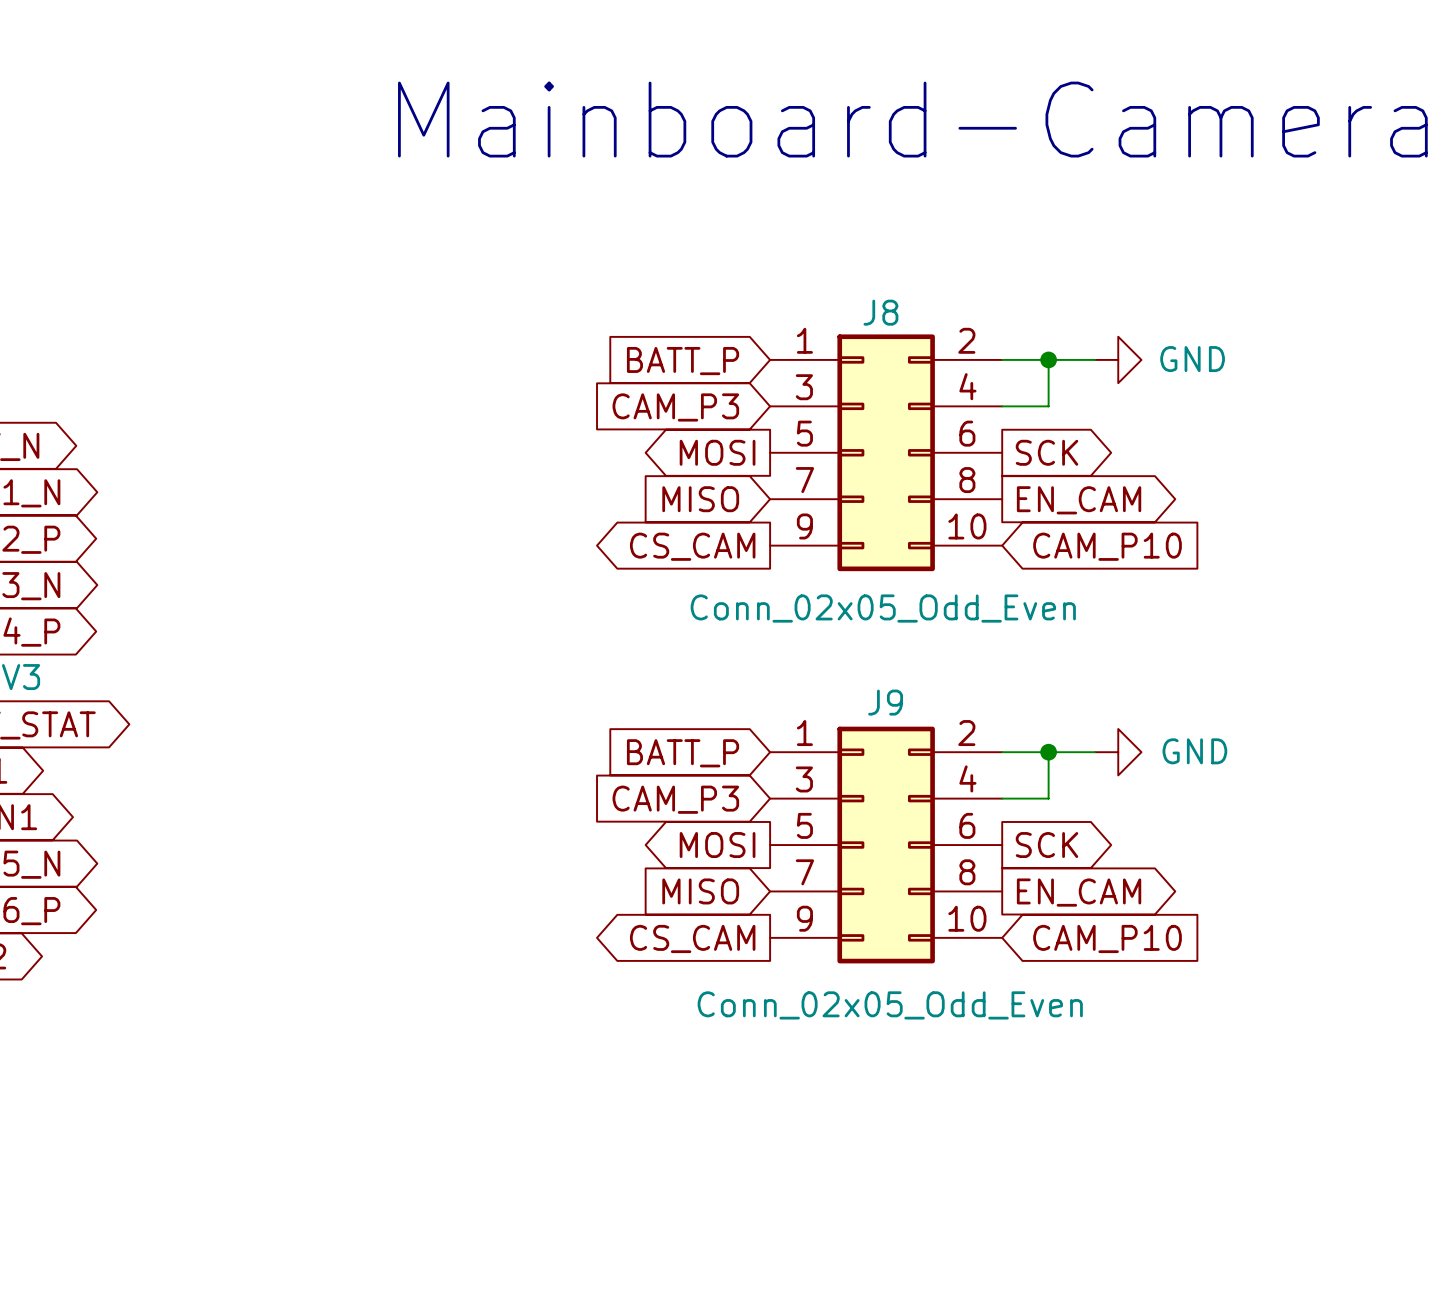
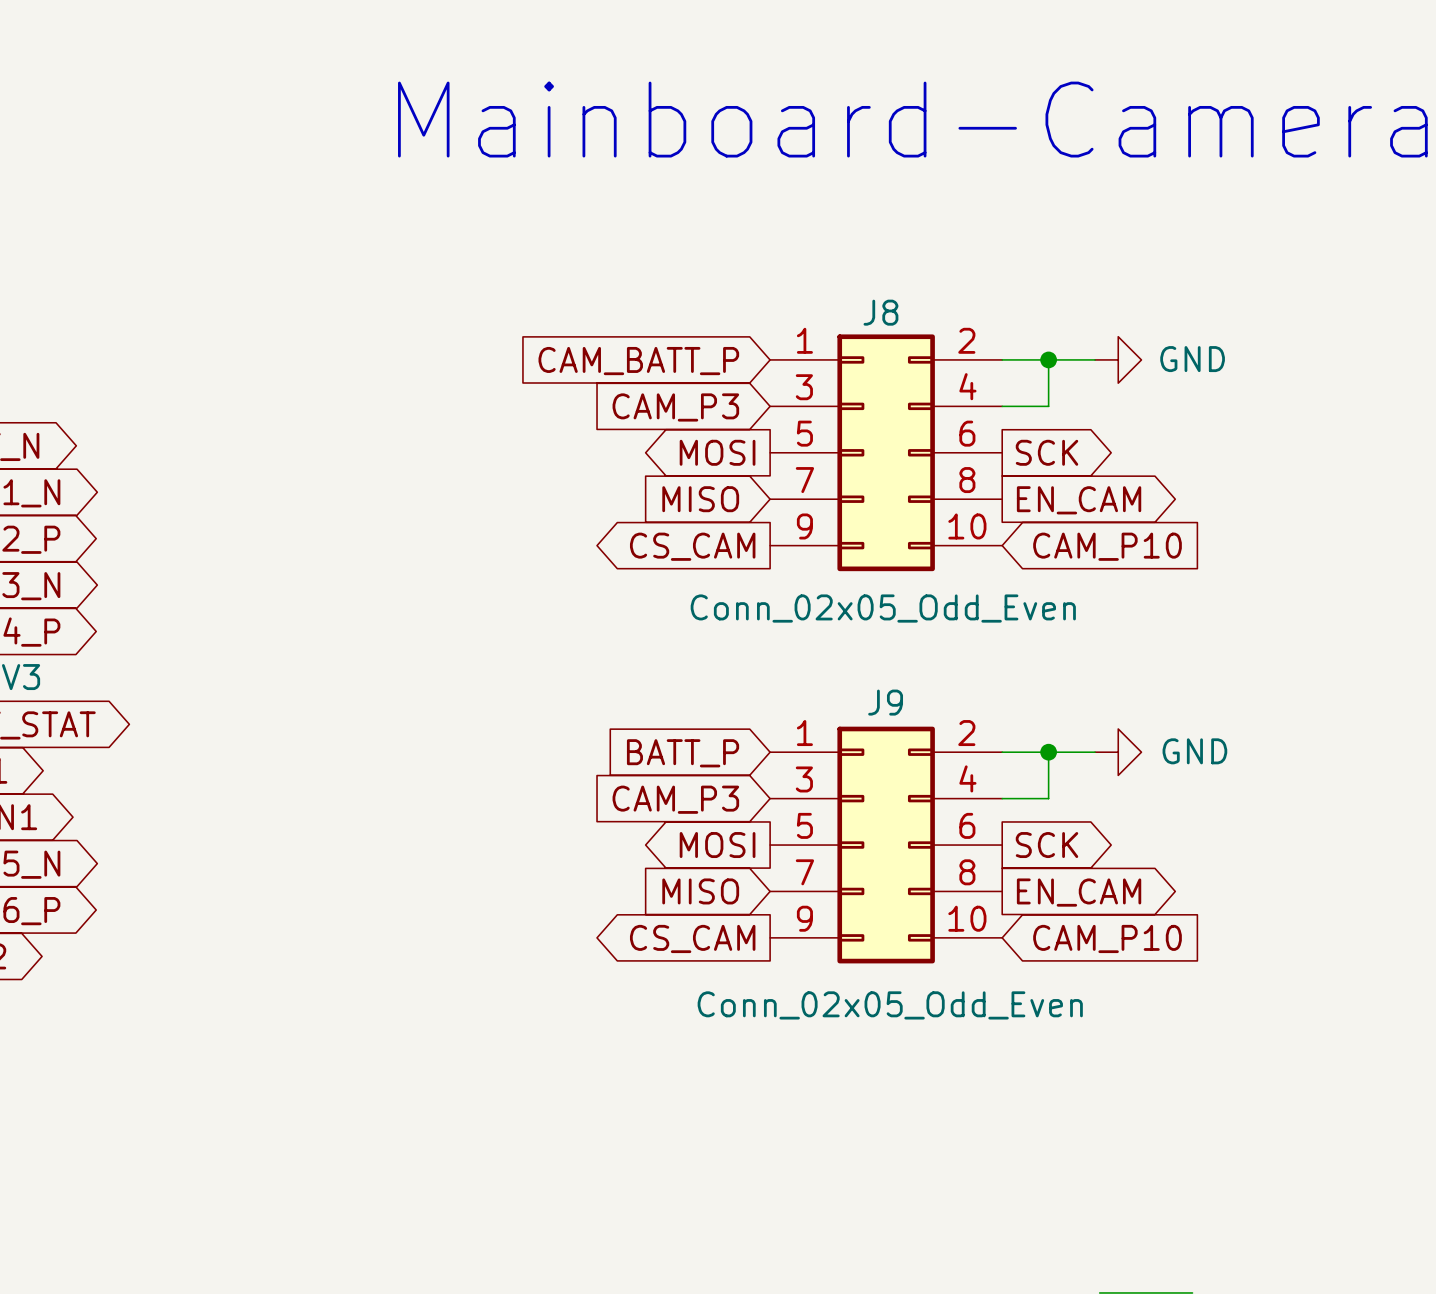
global label: BATT_P (683, 361) -> CAM_BATT_P (638, 361)
wire: none -> (1099, 1292) (1192, 1292)

